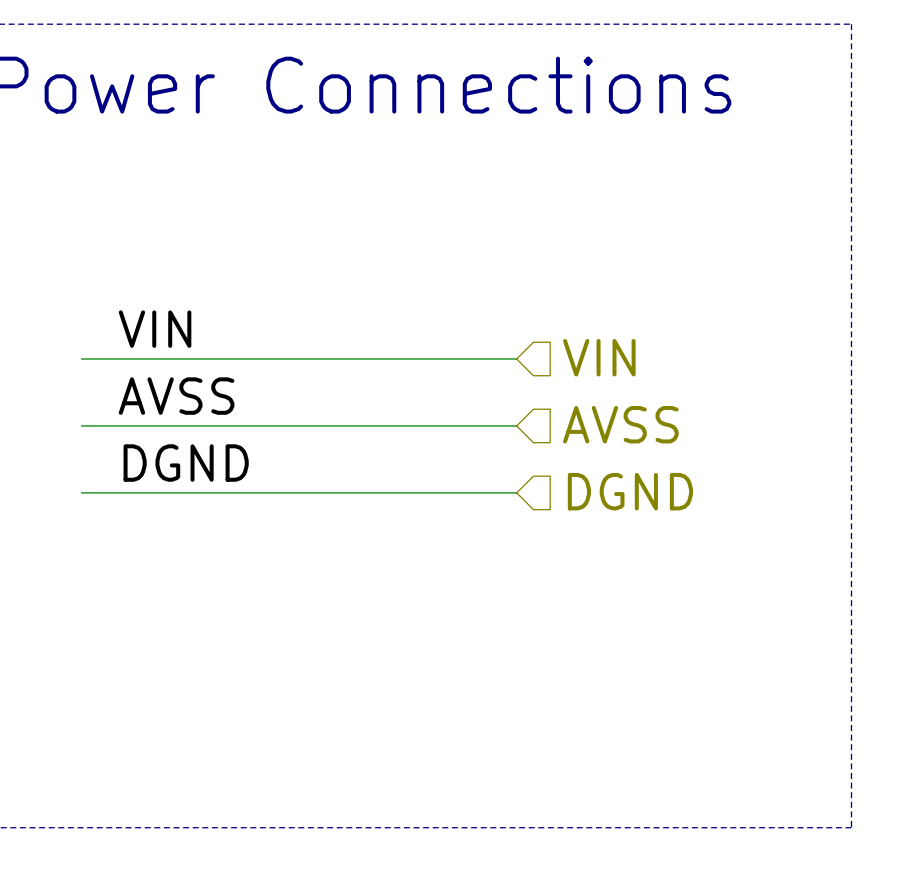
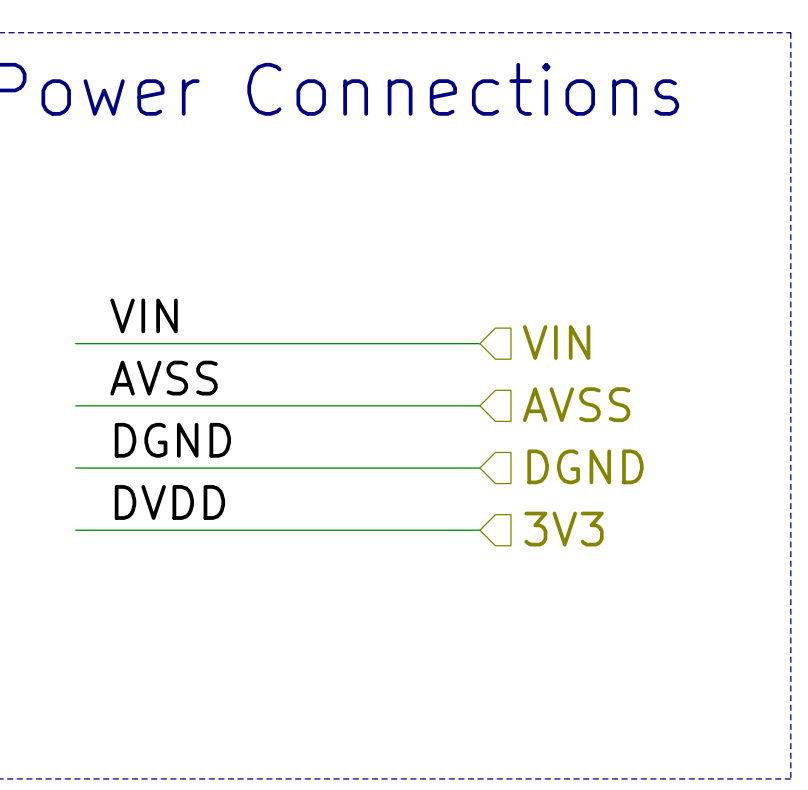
label: none -> DVDD (169, 502)
hierarchical label: none -> 3V3 (564, 529)
wire: none -> (75, 530) (479, 530)

